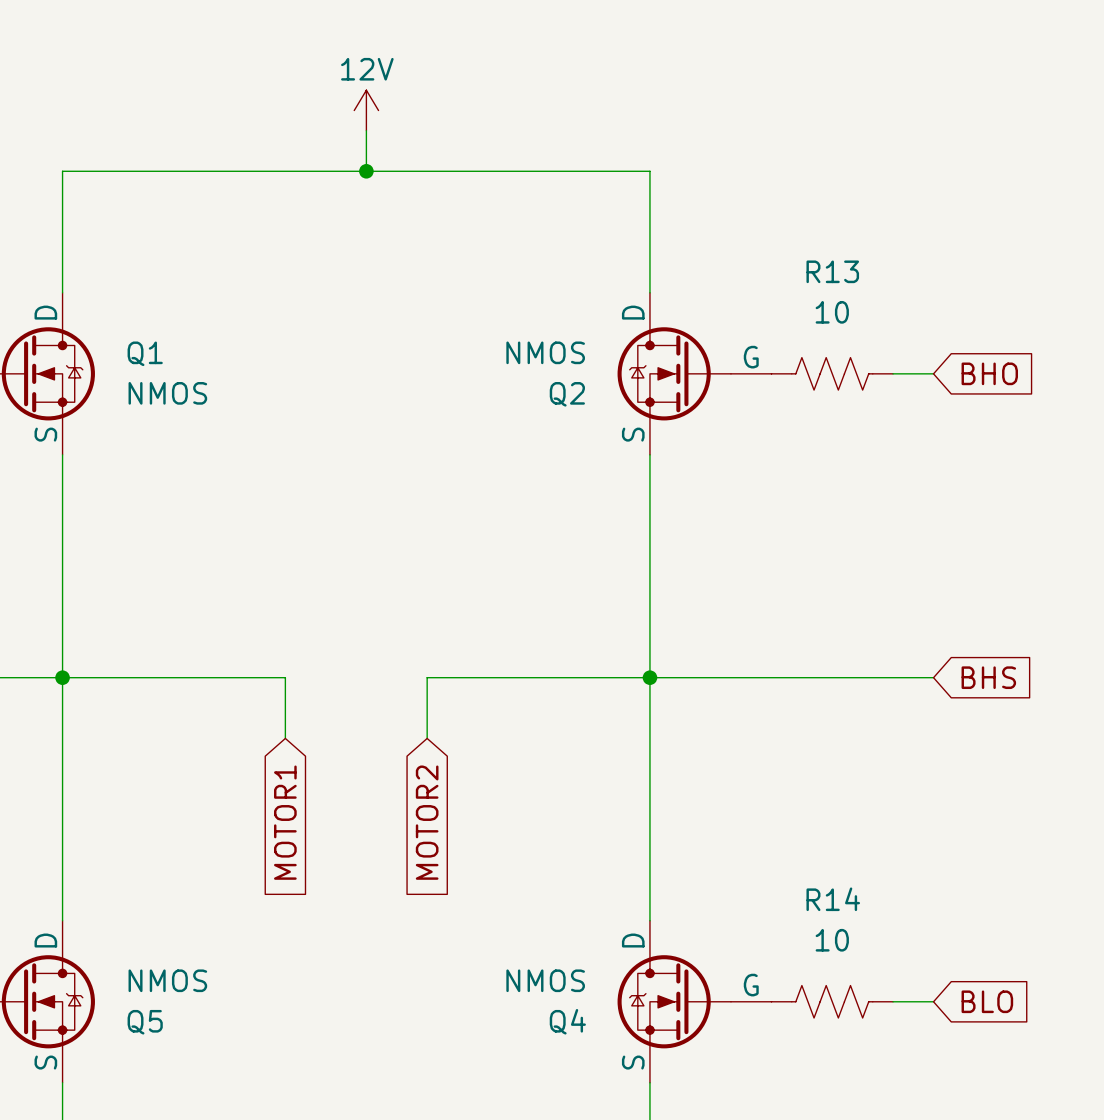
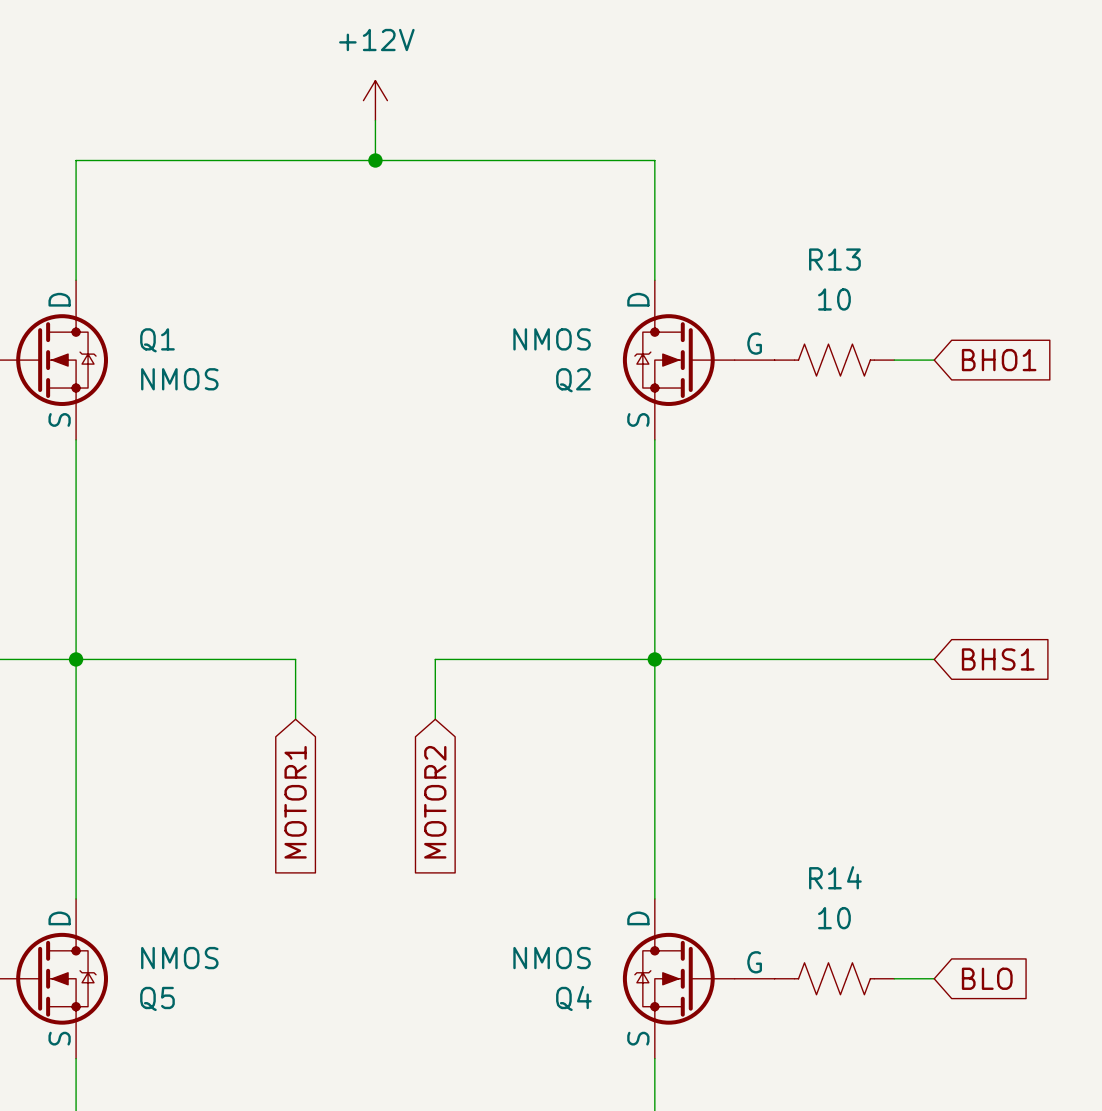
power symbol: 12V (366, 110) -> +12V (375, 100)
global label: BHO (989, 373) -> BHO1 (999, 360)
global label: BHS (988, 677) -> BHS1 (998, 659)

